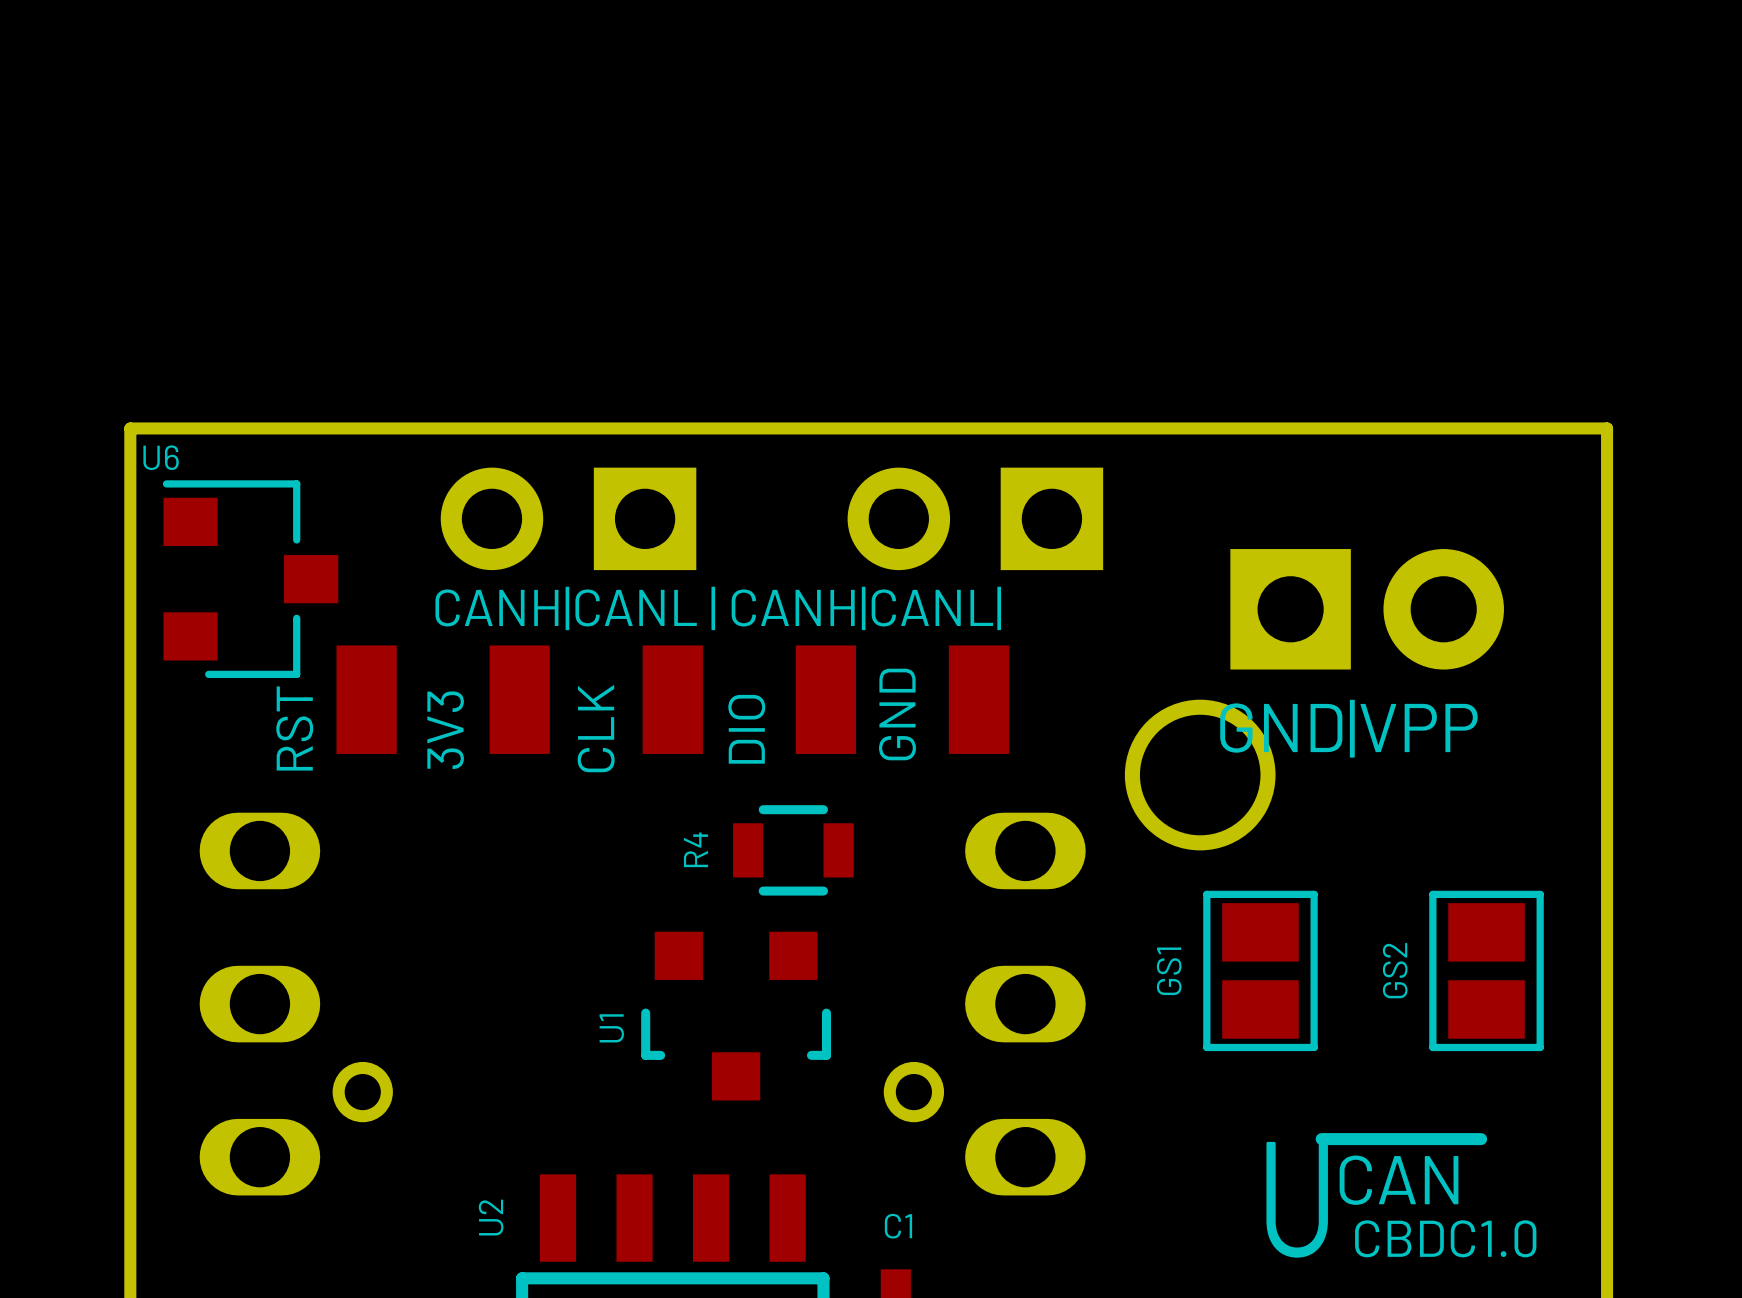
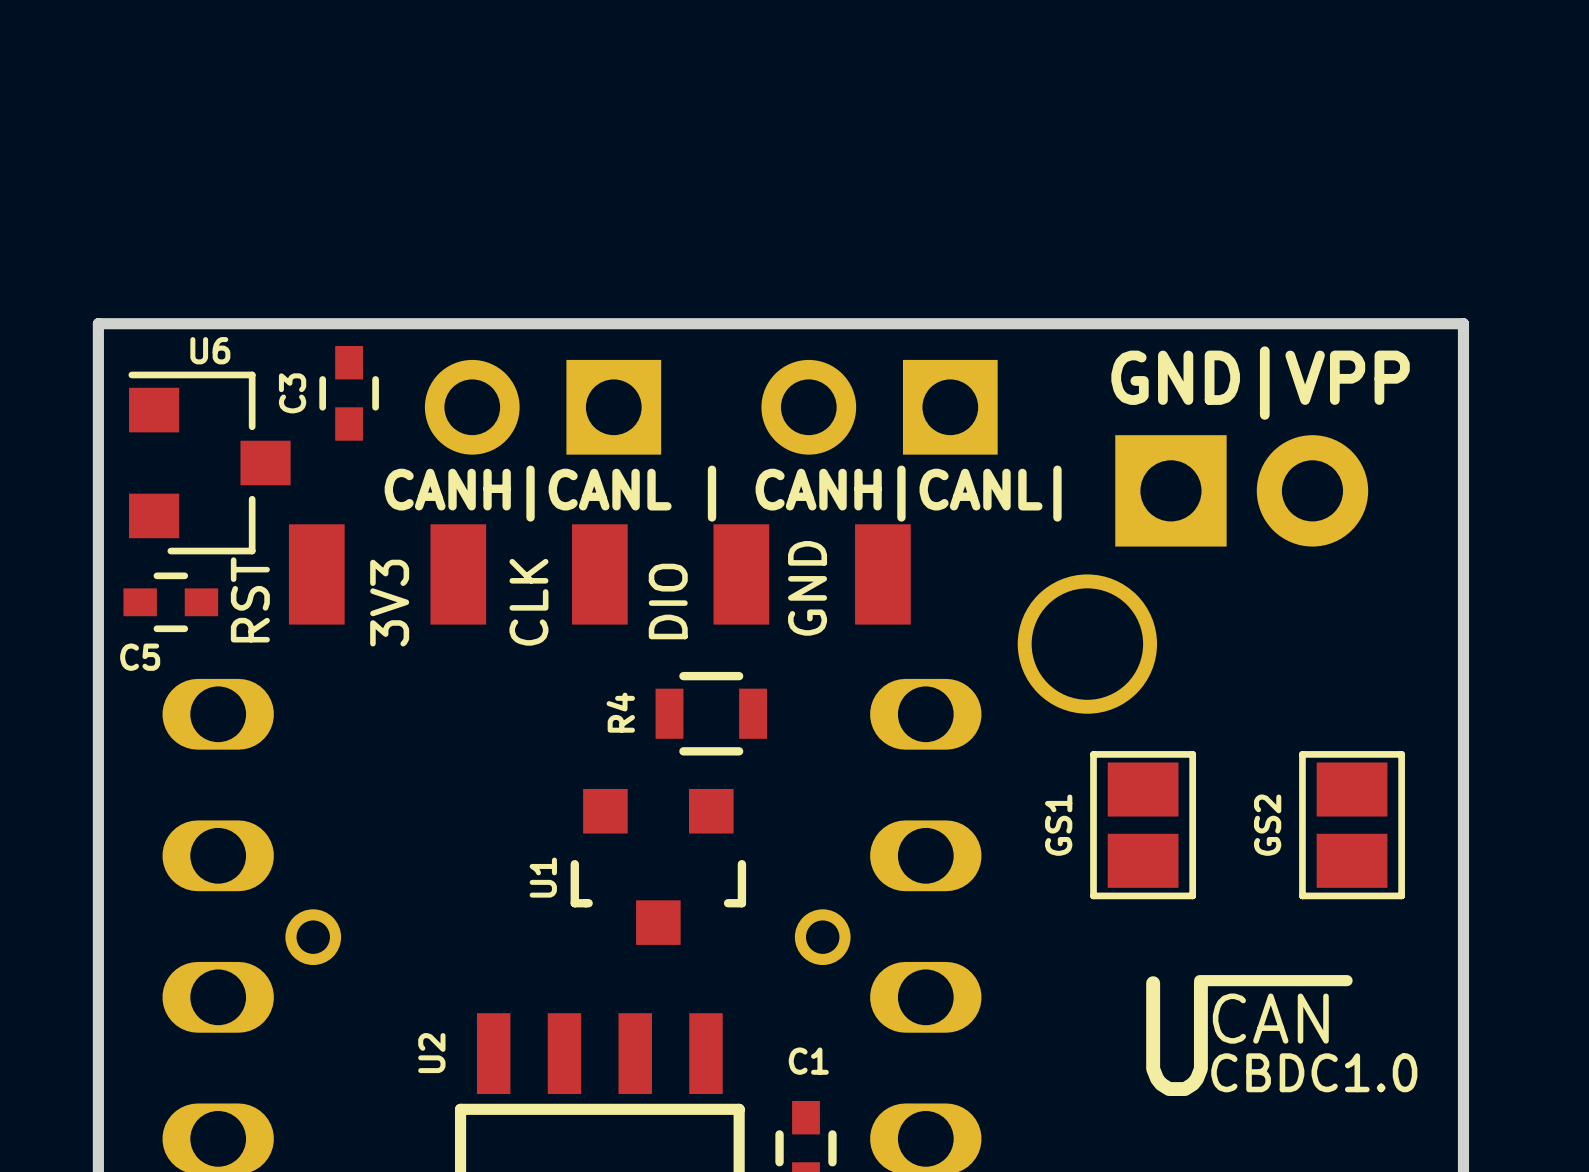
U6 name position: U6 (161, 457) -> U6 (210, 350)
C3: none -> (349, 393)
part position: (568, 518) -> (543, 407)
text position: GND|VPP (1348, 728) -> GND|VPP (1260, 383)
C5: none -> (170, 602)

